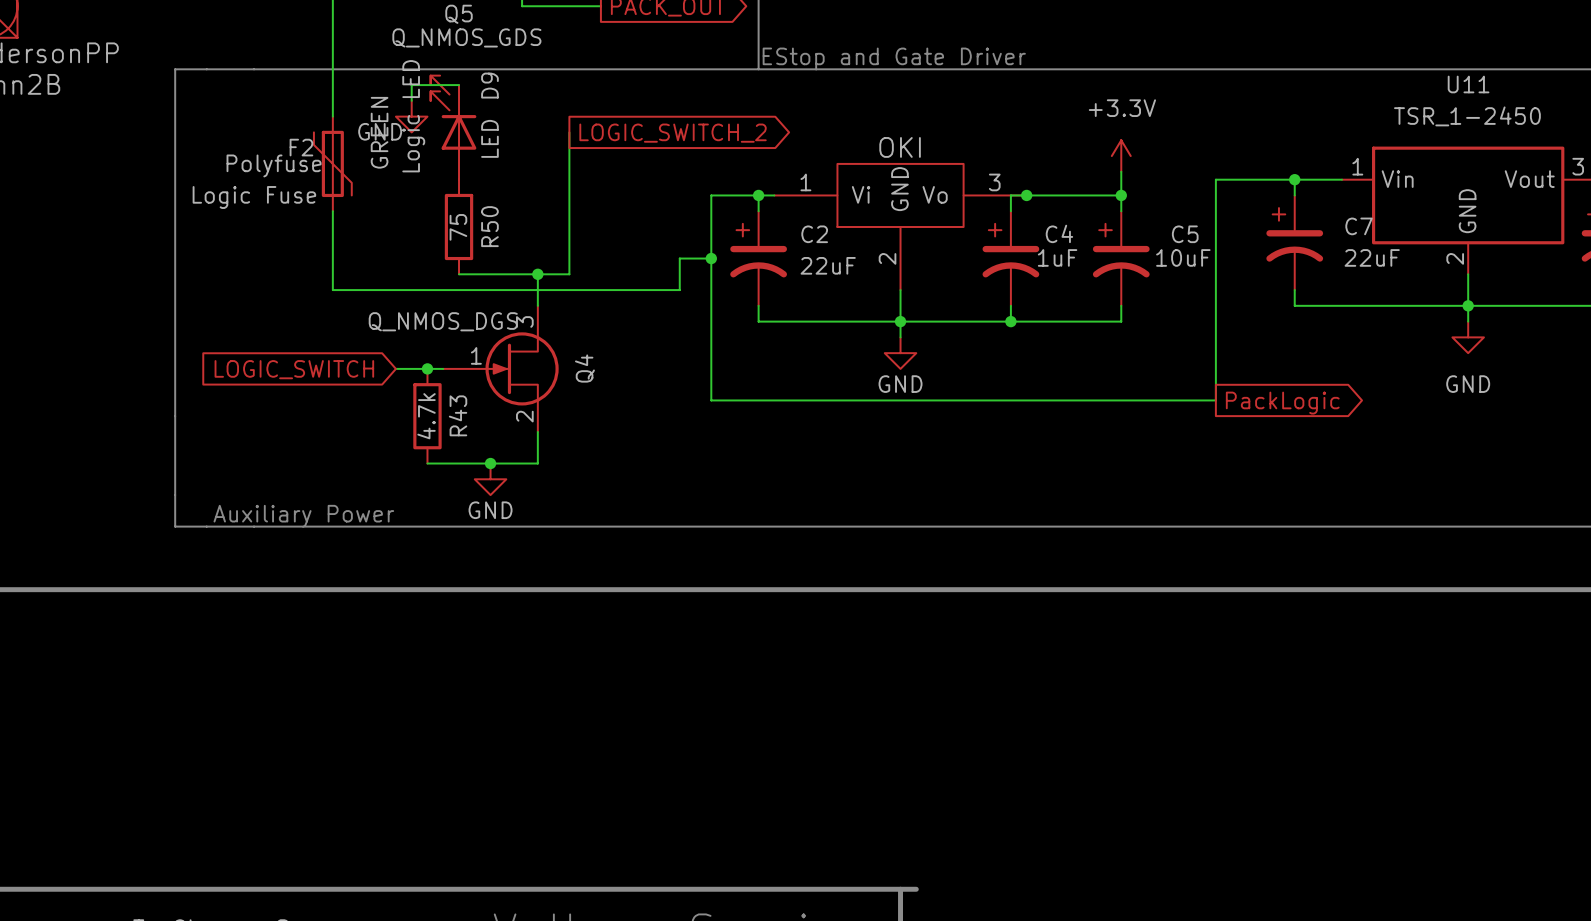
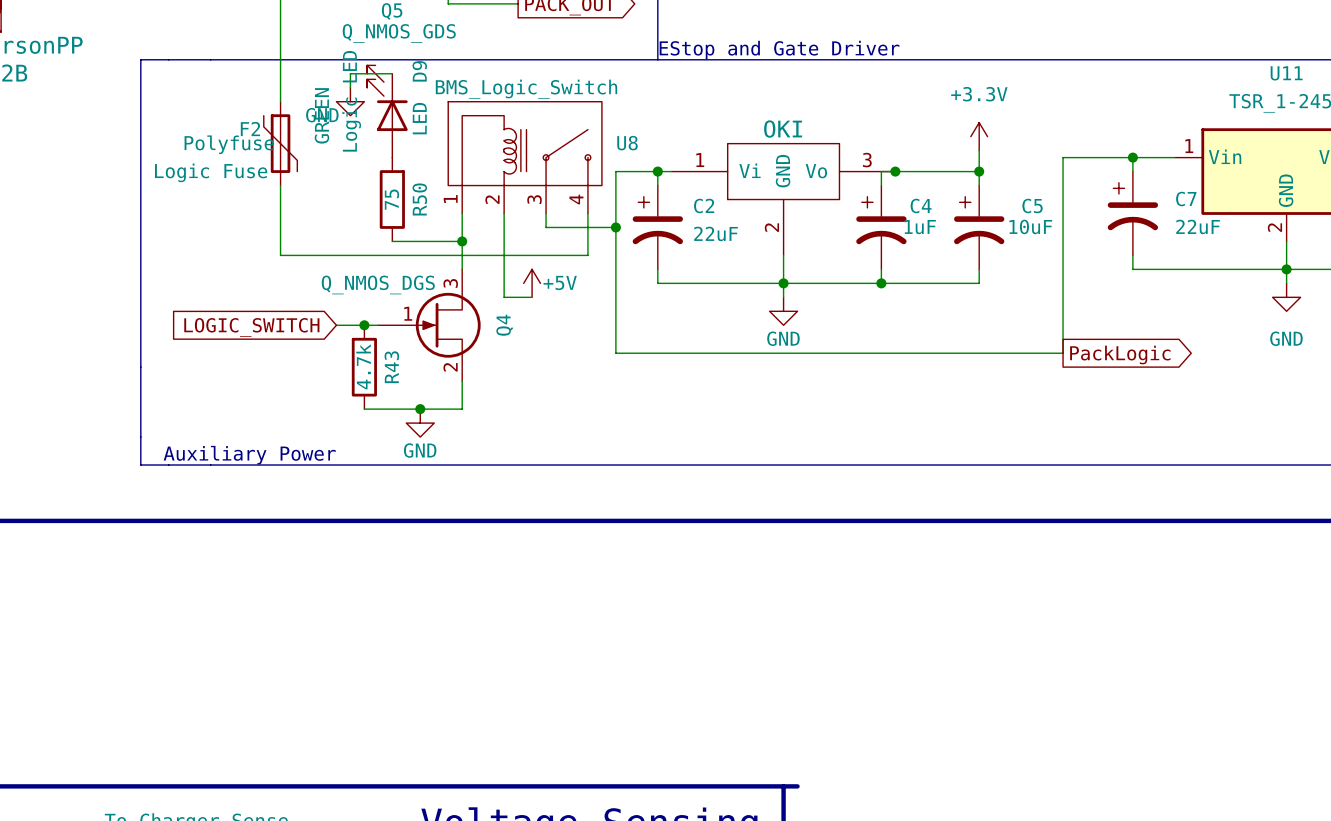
wire: (569, 132) (569, 274) (537, 274) -> (462, 213) (462, 241)
global label: LOGIC_SWITCH_2 (673, 133) -> none
U8: none -> BMS_Logic_Switch (525, 157)
wire: none -> (504, 213) (504, 297) (532, 297)
wire: none -> (546, 213) (546, 227) (587, 227) (587, 213)
power symbol: none -> +5V (532, 283)

